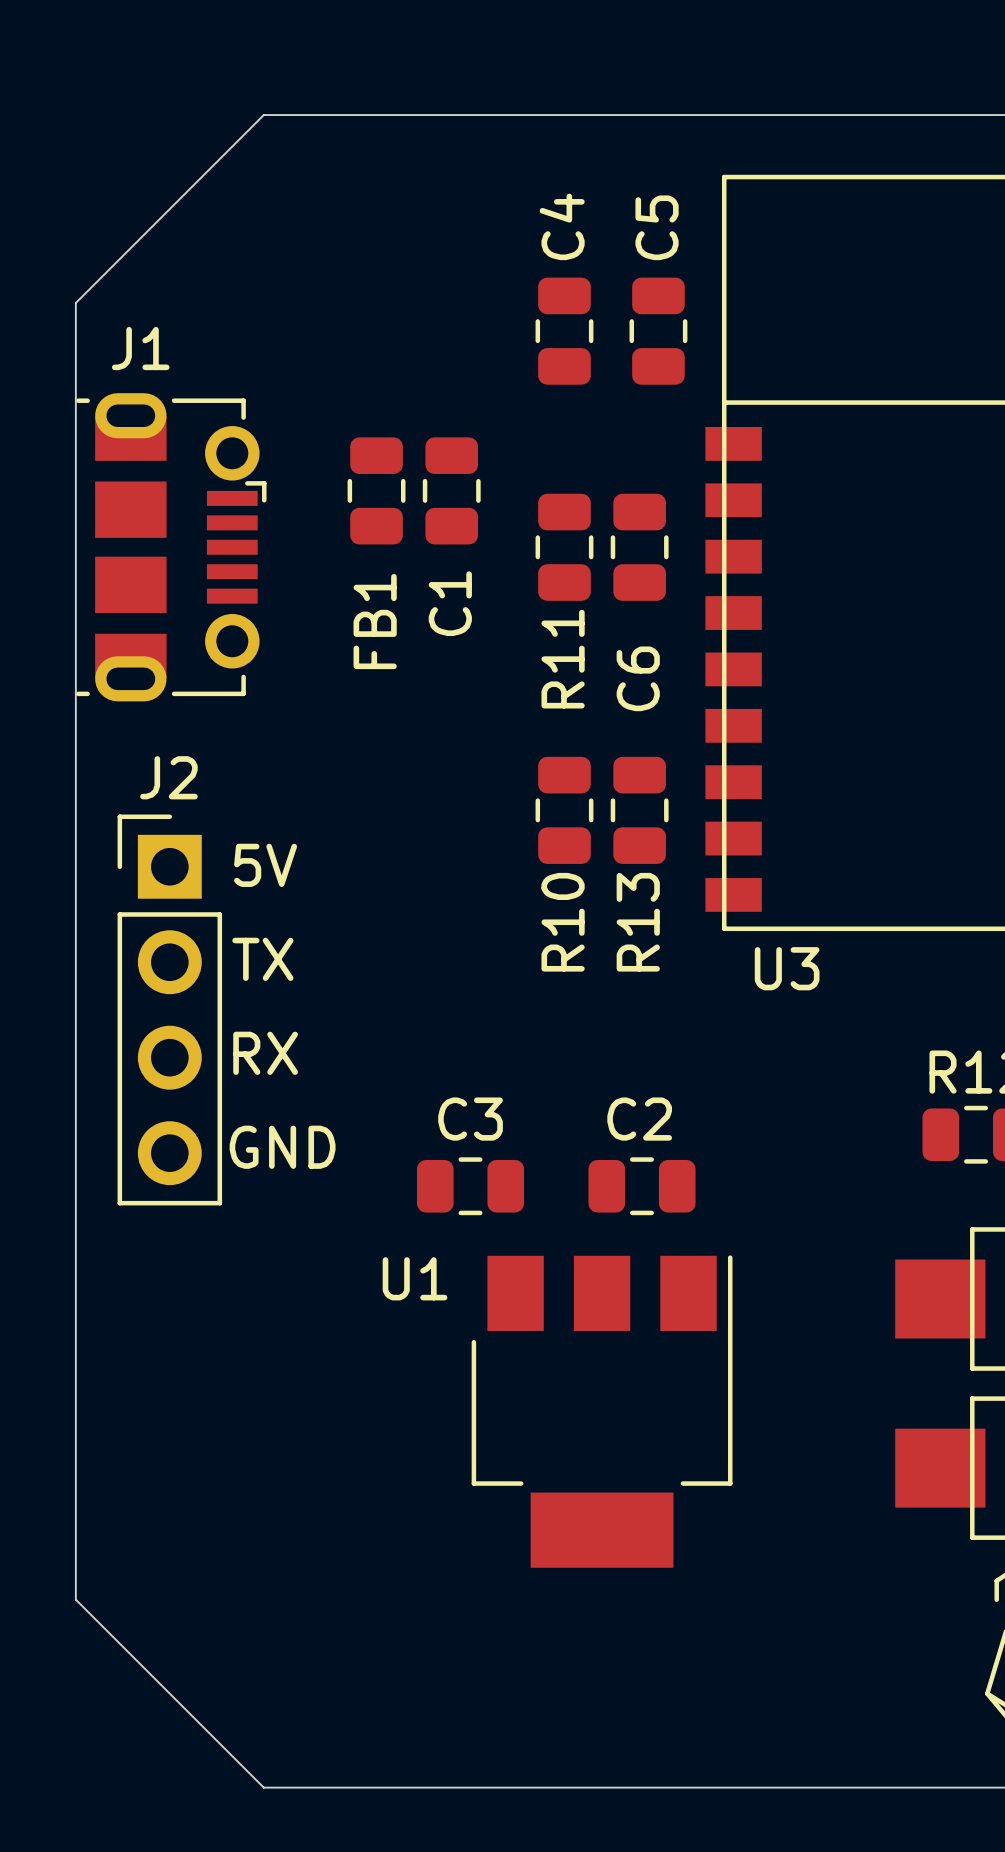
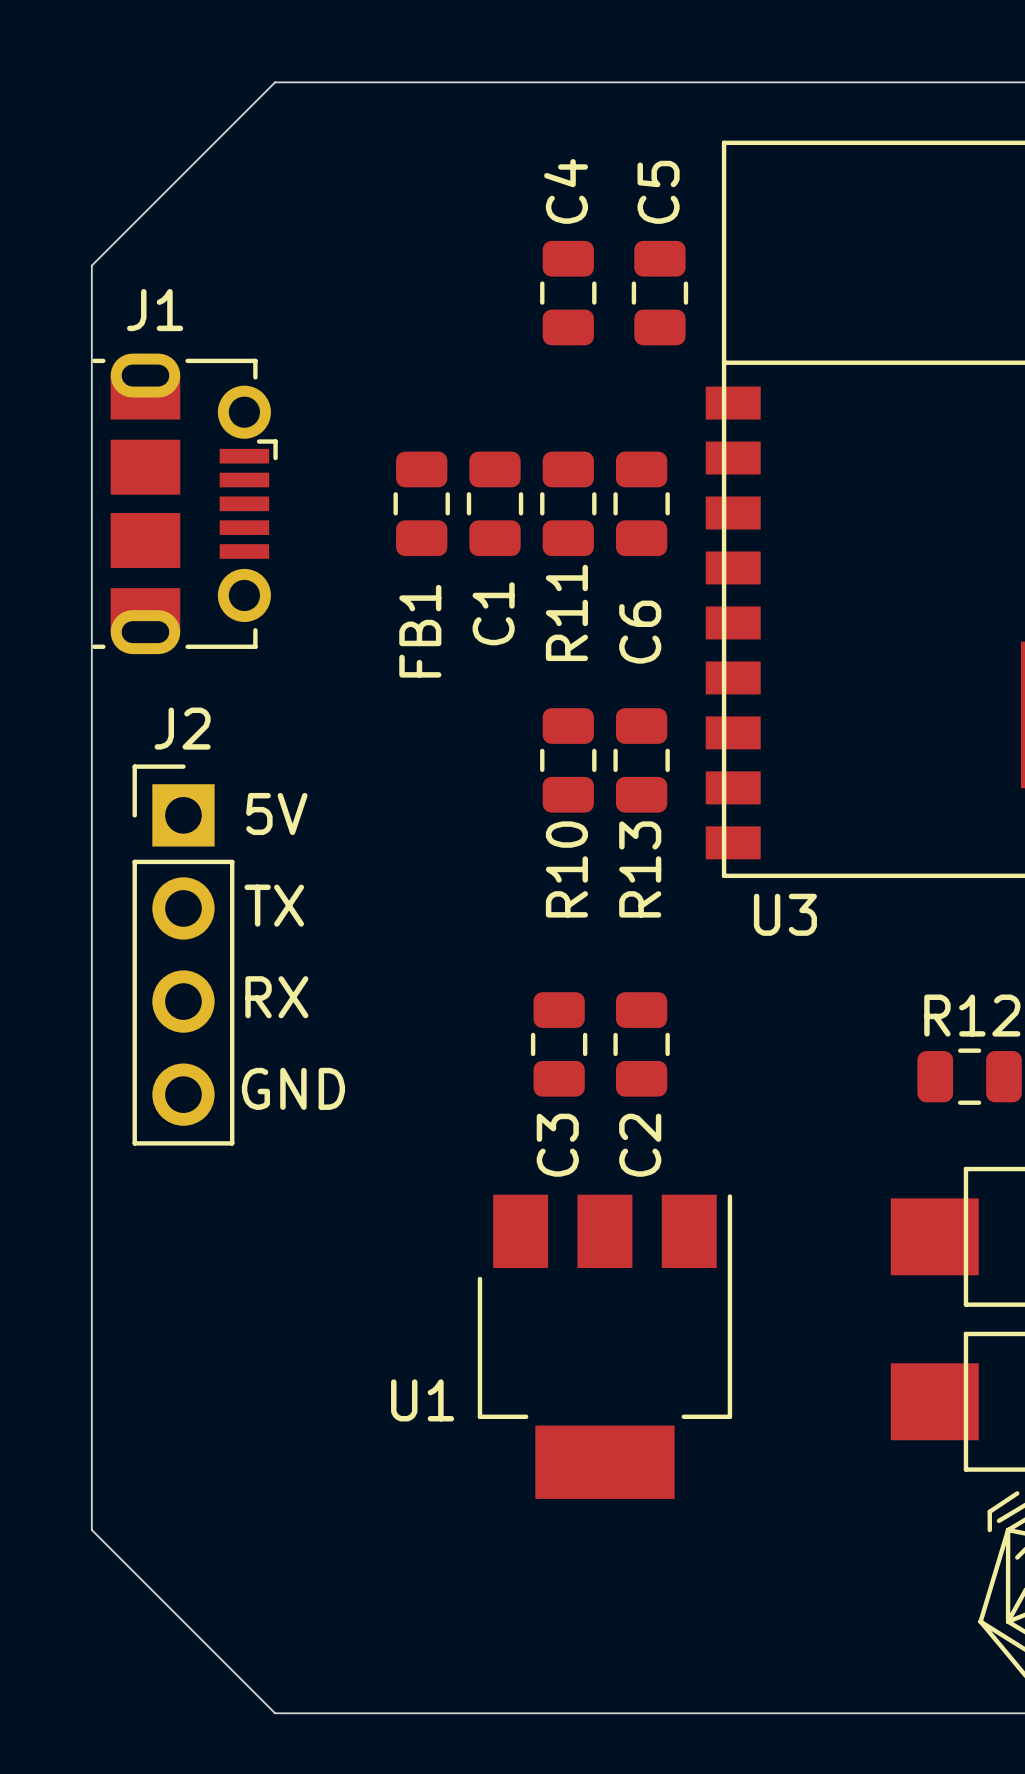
FB1 position: (376, 490) -> (421, 503)
C1 position: (451, 490) -> (495, 503)
C3 name position: C3 (470, 1119) -> C3 (557, 1145)
C2 name position: C2 (639, 1119) -> C2 (640, 1145)
C3 rotation: 0° (470, 1186) -> 90° clockwise (559, 1044)
C3 position: (470, 1186) -> (559, 1044)
C2 rotation: 0° (642, 1186) -> 90° clockwise (641, 1044)
C2 position: (642, 1186) -> (641, 1044)
U1 name position: U1 (415, 1278) -> U1 (422, 1400)

